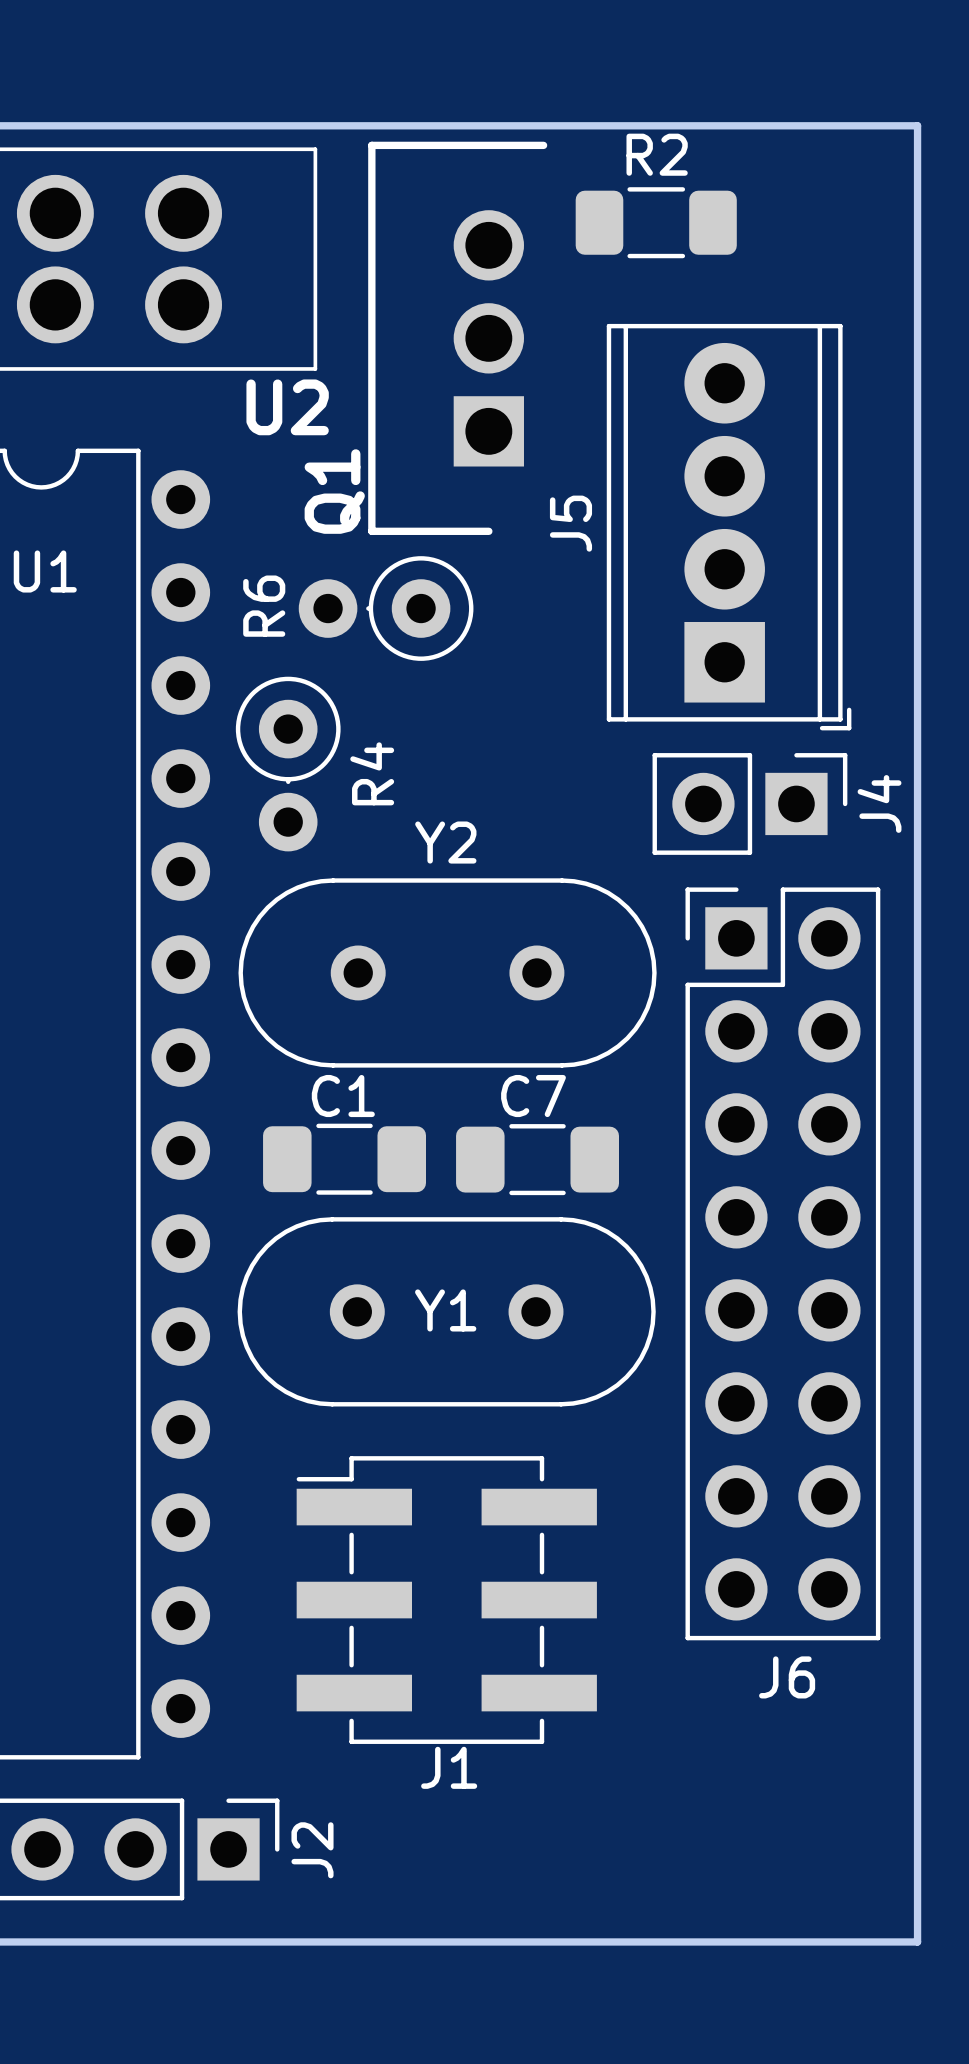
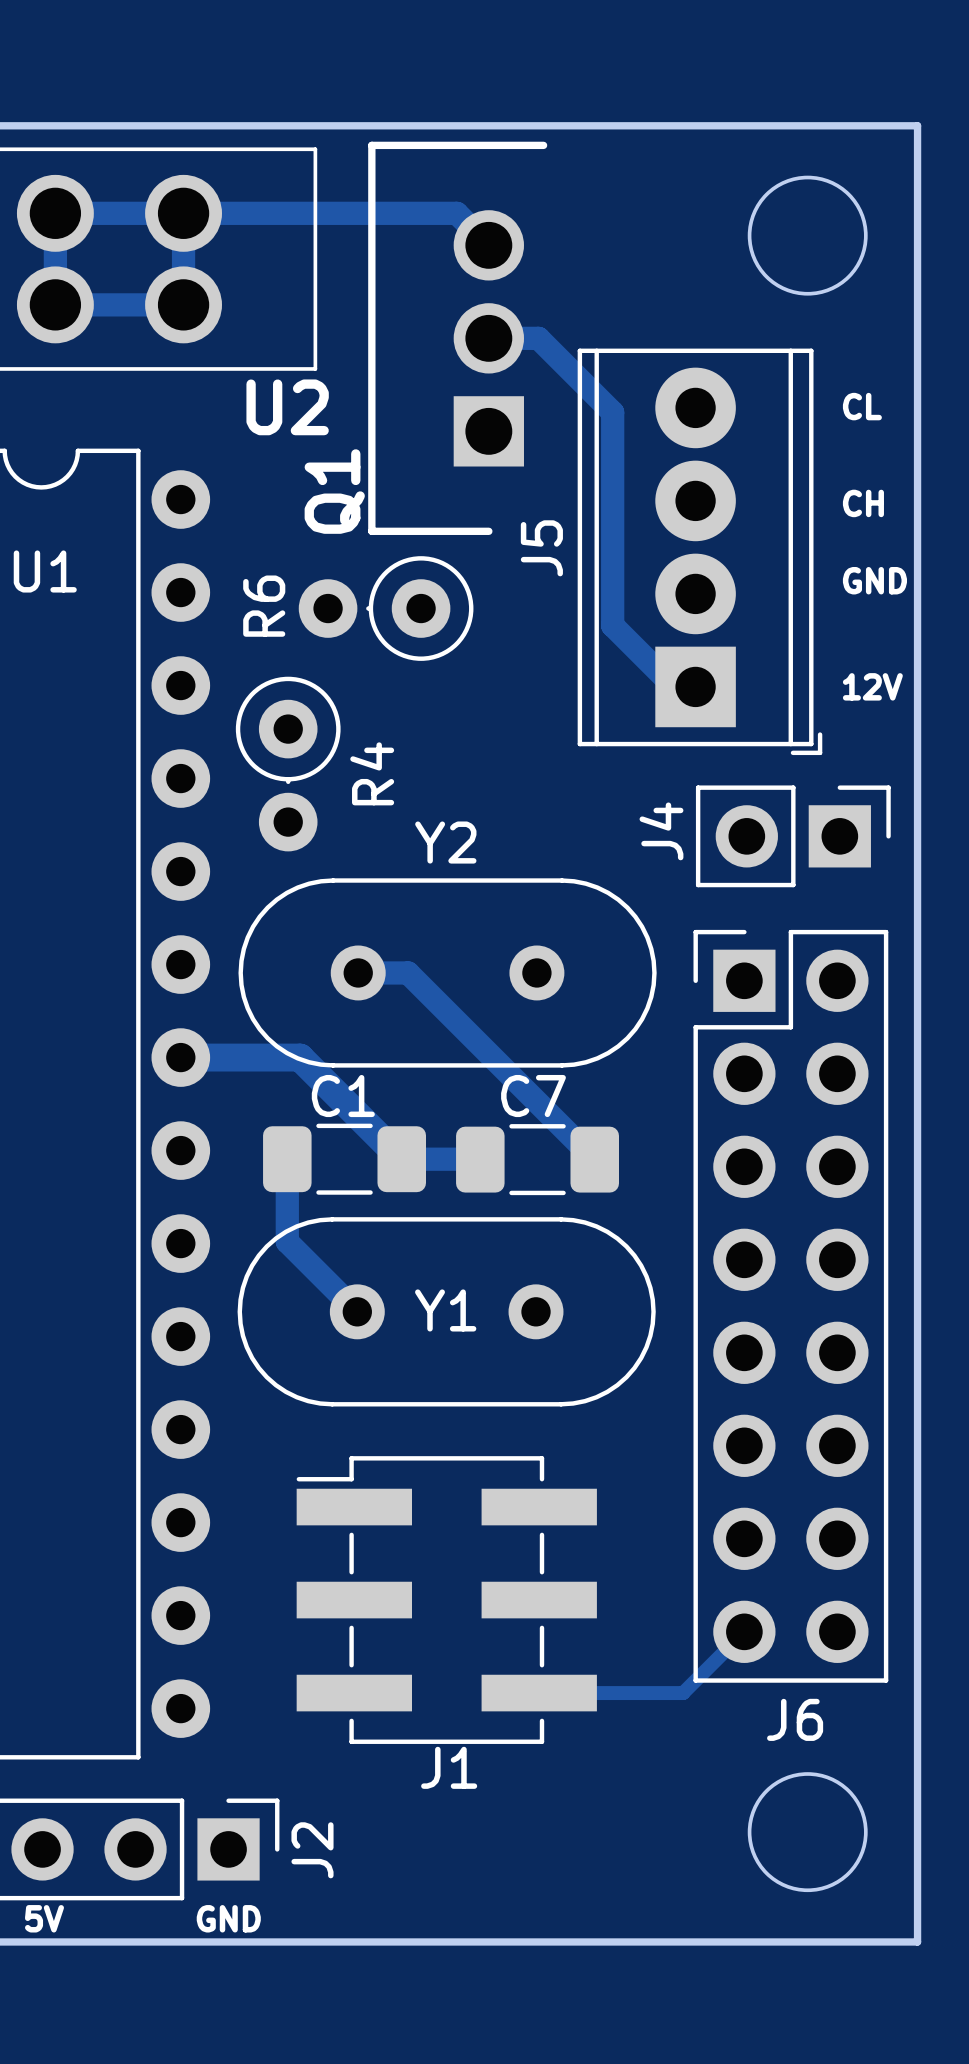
round board edge: none -> [747, 175, 868, 296]
track: none -> (183, 213) (183, 304) (55, 304) (55, 213) (456, 213) (488, 245)
R2: (656, 222) -> none
track: none -> (488, 338) (538, 338) (612, 412) (612, 625) (674, 686) (695, 686)
text: none -> CL (862, 406)
text: none -> CH (863, 503)
J5 position: (729, 527) -> (699, 551)
text: none -> GND (874, 580)
text: none -> 12V (872, 686)
J4 position: (749, 803) -> (793, 836)
J4 name position: J4 (879, 803) -> J4 (661, 831)
track: none -> (358, 972) (408, 972) (594, 1159)
track: none -> (180, 1057) (300, 1057) (401, 1159) (479, 1159)
track: none -> (287, 1159) (287, 1241) (357, 1311)
J6 position: (782, 1263) -> (790, 1306)
track: none -> (744, 1631) (683, 1693) (539, 1693)
round board edge: none -> [747, 1772, 868, 1893]
text: none -> 5V (44, 1918)
text: none -> GND (228, 1918)

